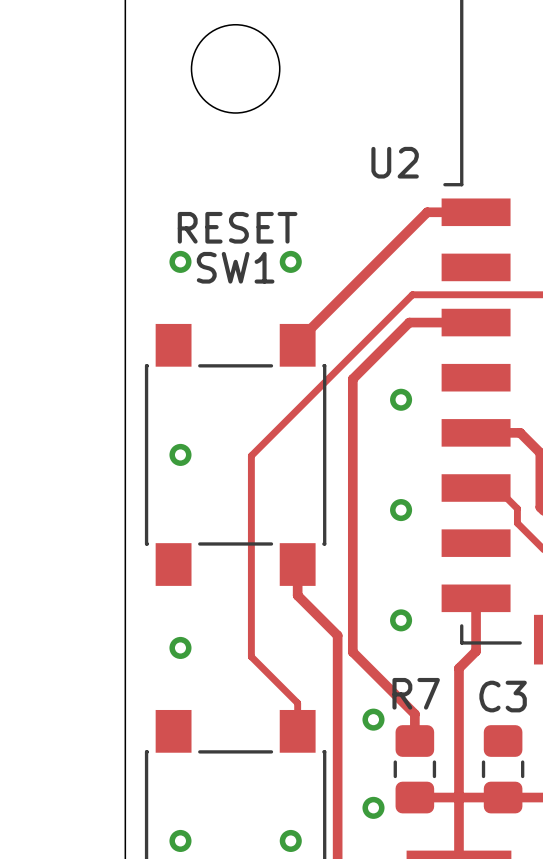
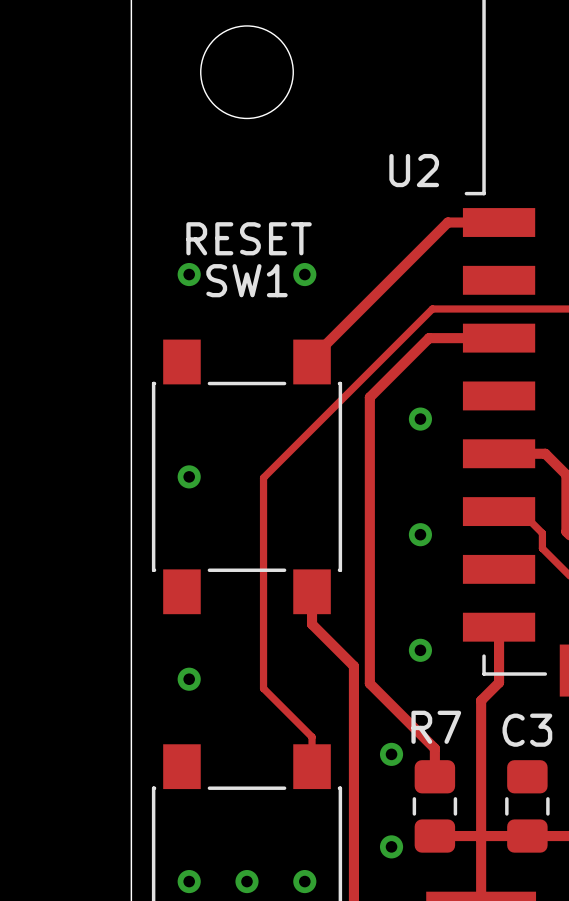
via: none -> (247, 881)

